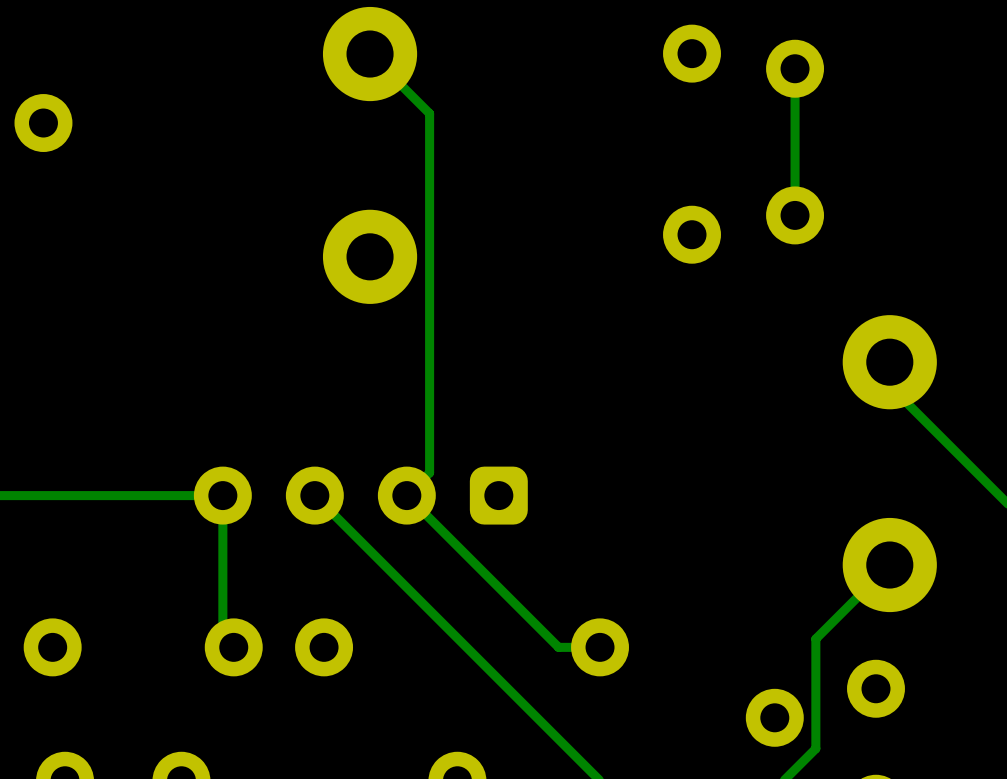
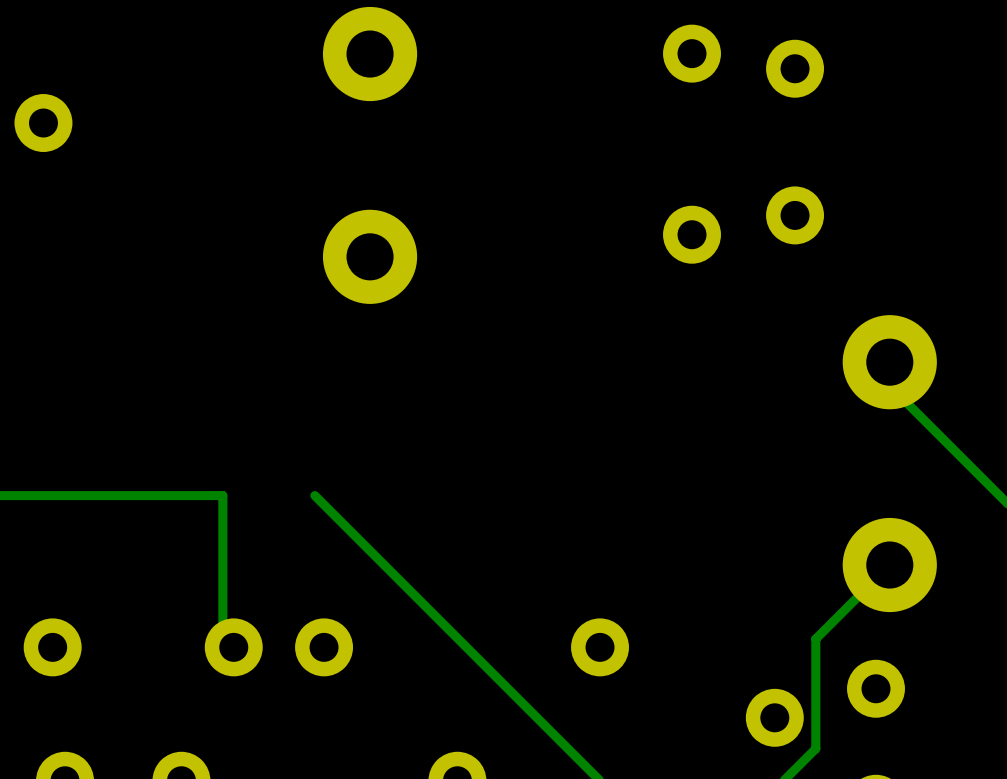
track: (370, 54) (429, 113) (429, 472) (406, 495) (558, 647) (600, 647) -> none
track: (795, 68) (795, 215) -> none
part: (360, 495) -> none

